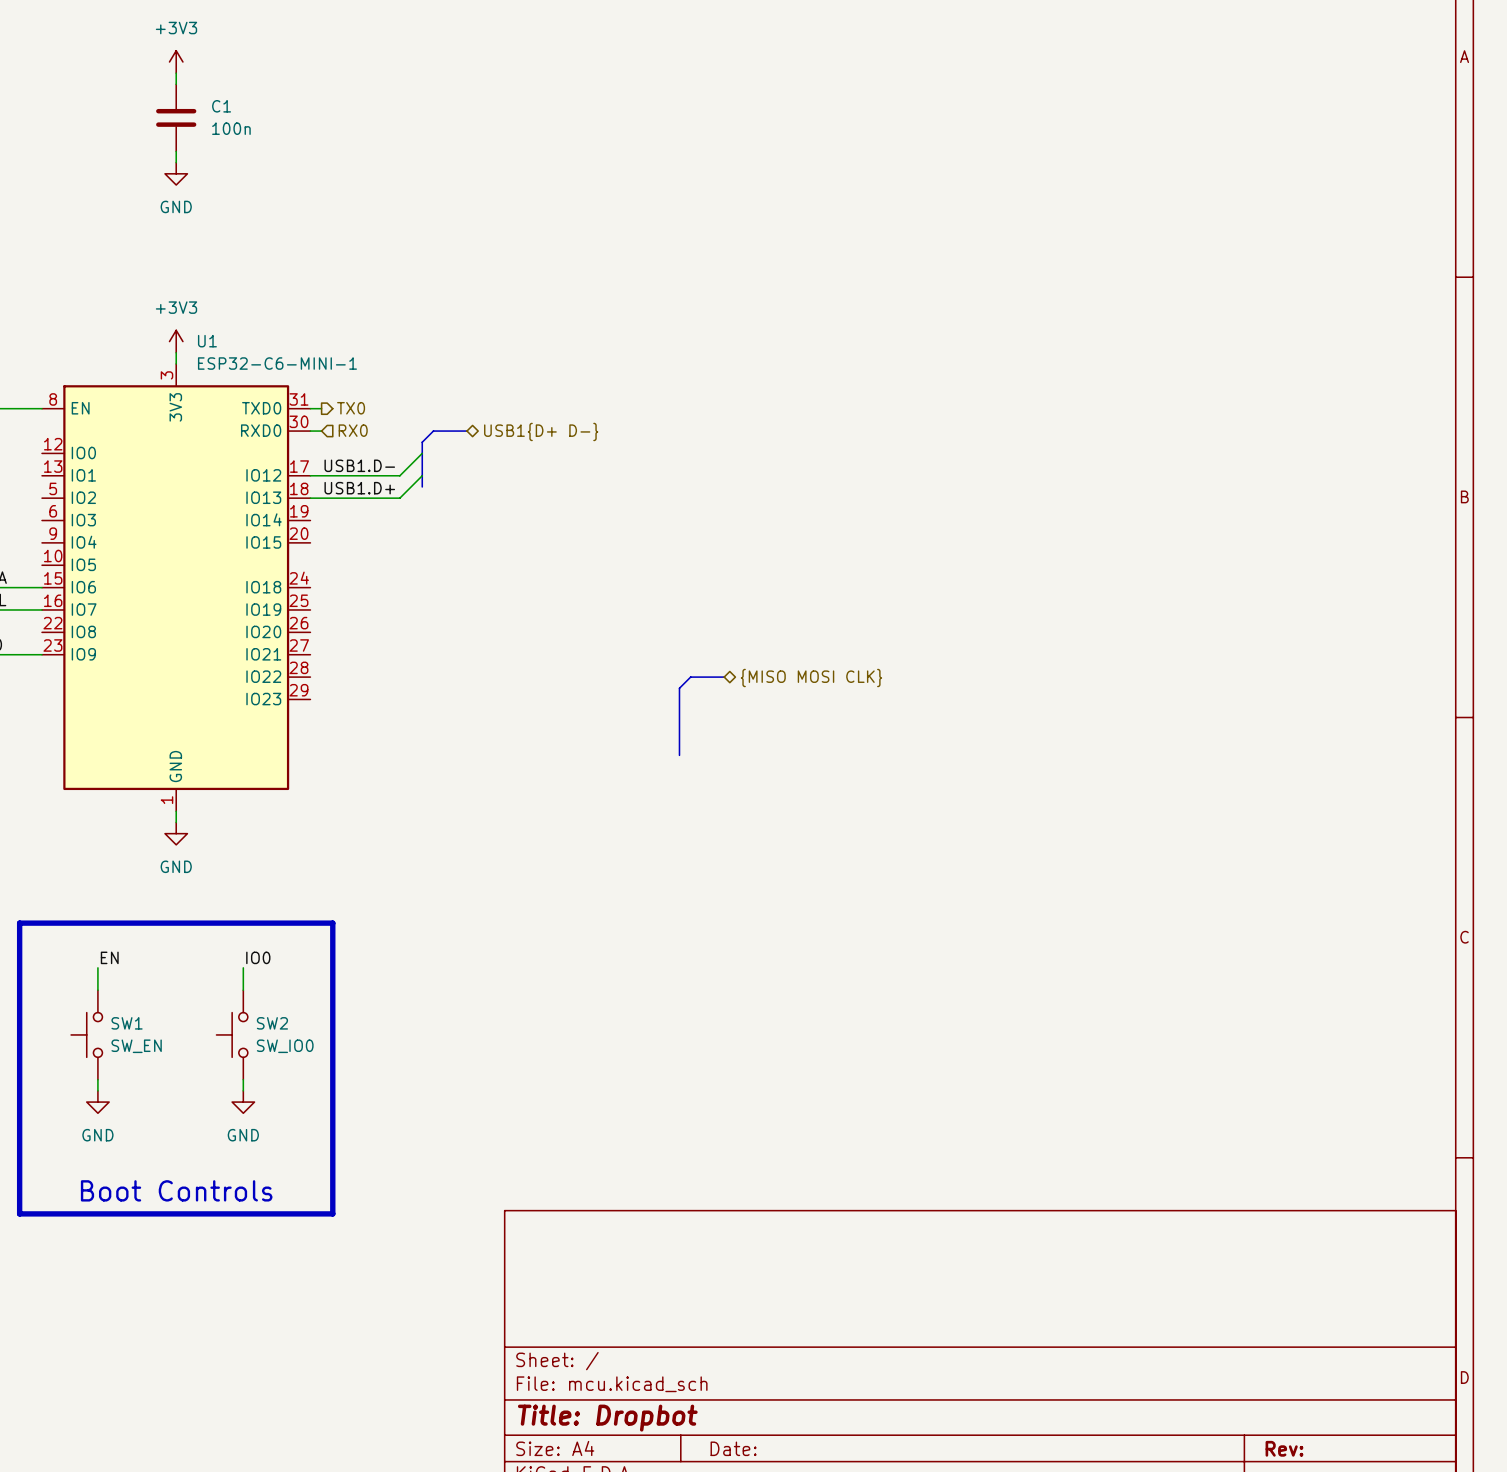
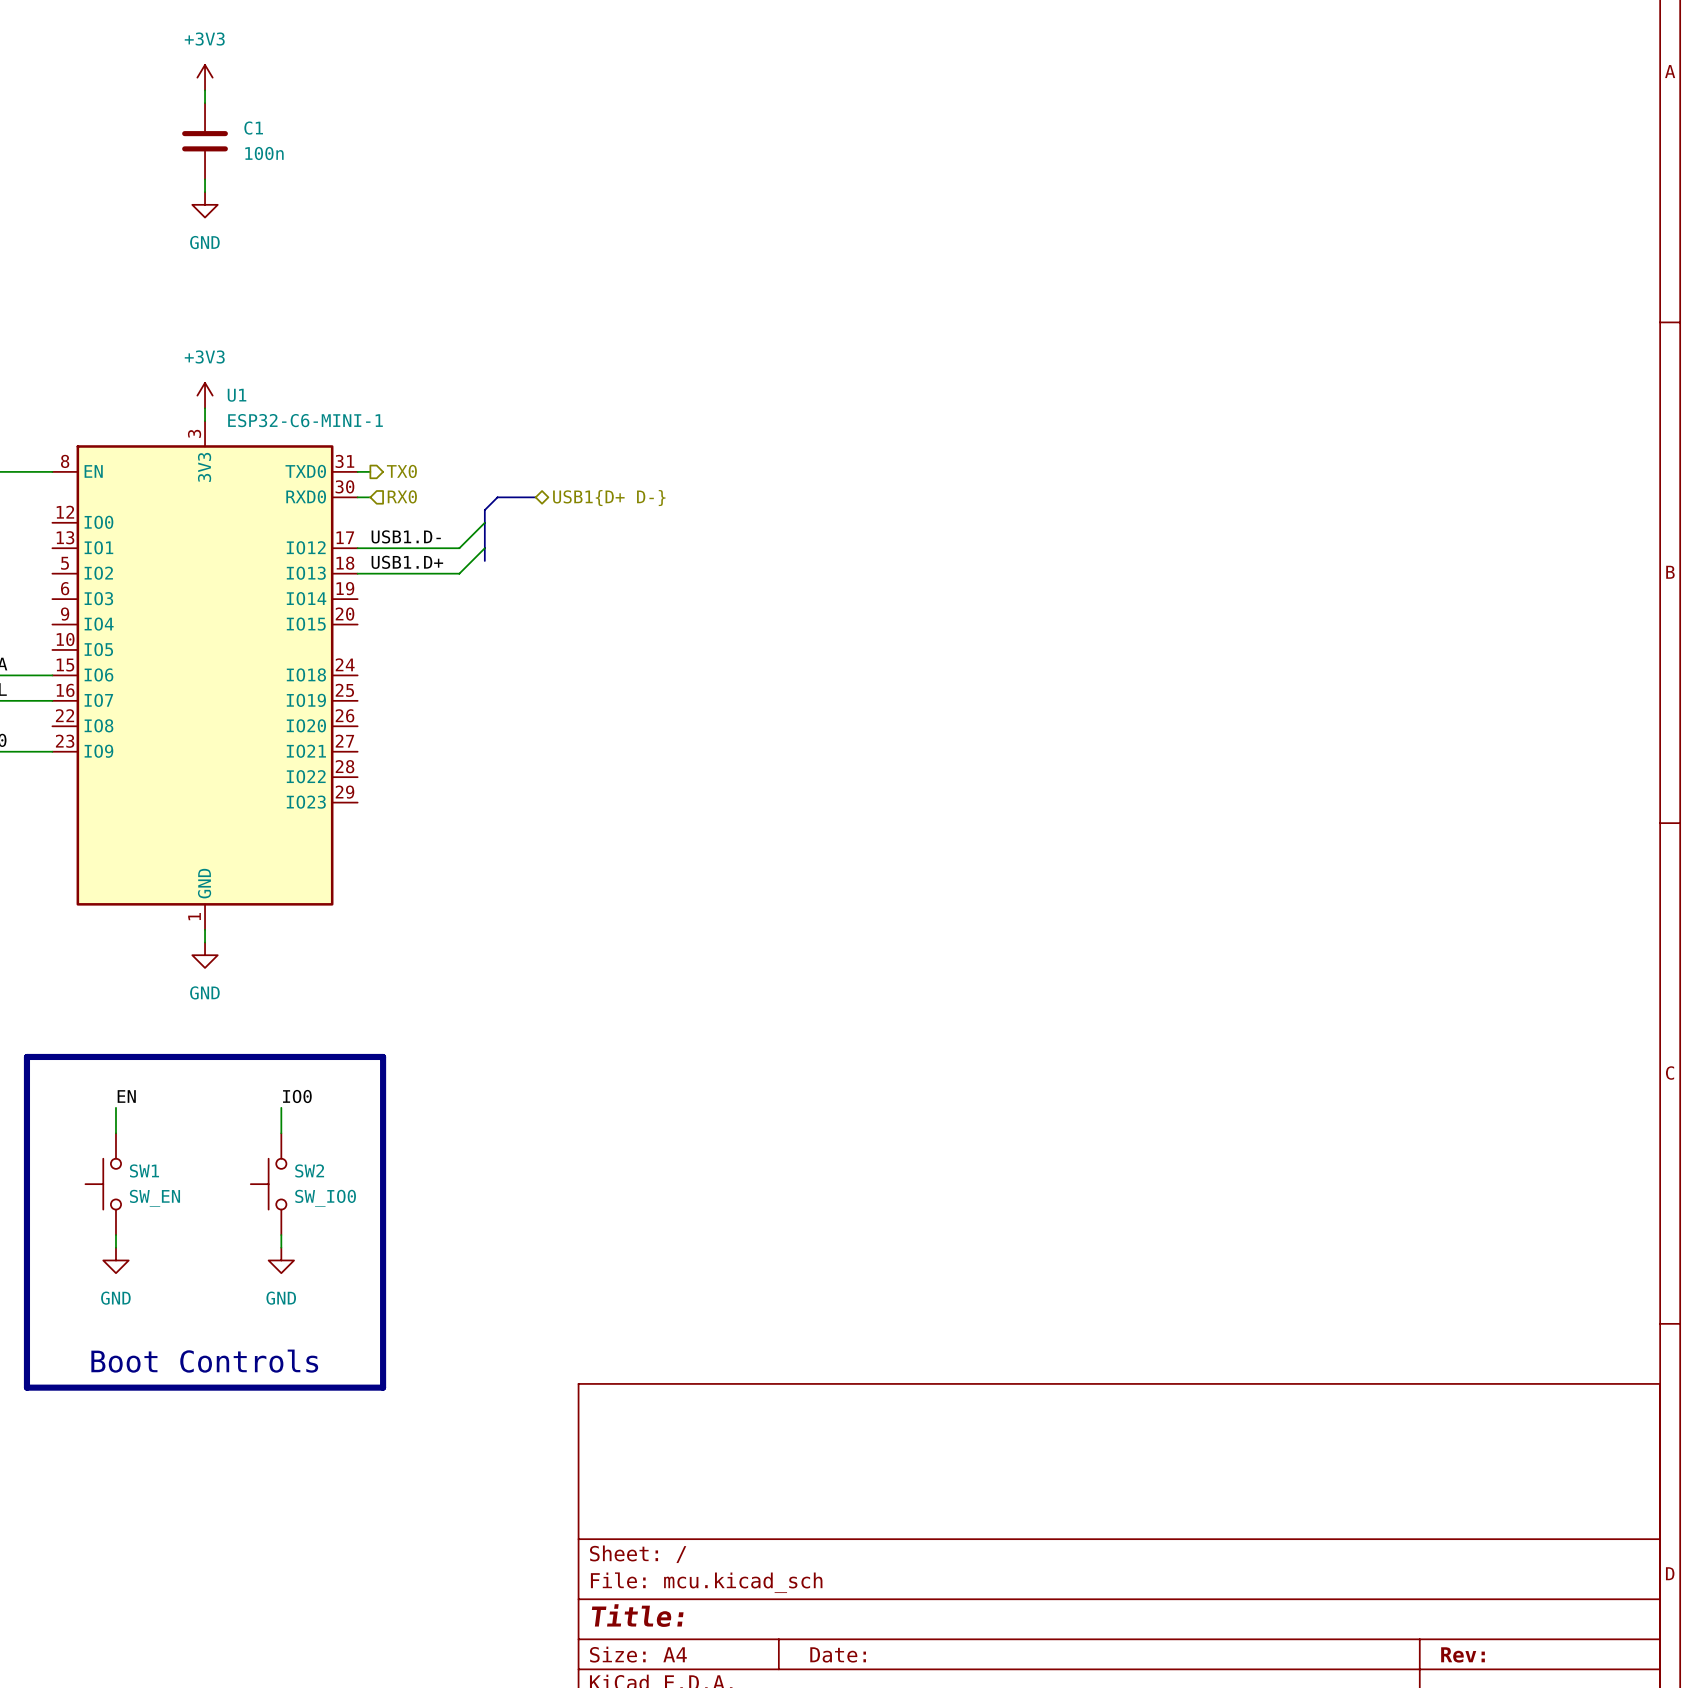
bus: (724, 677) (690, 677) (679, 688) (679, 755) -> none
hierarchical label: {MISO MOSI CLK} (811, 678) -> none
title block: Title: Dropbot (607, 1418) -> Title: (637, 1615)

